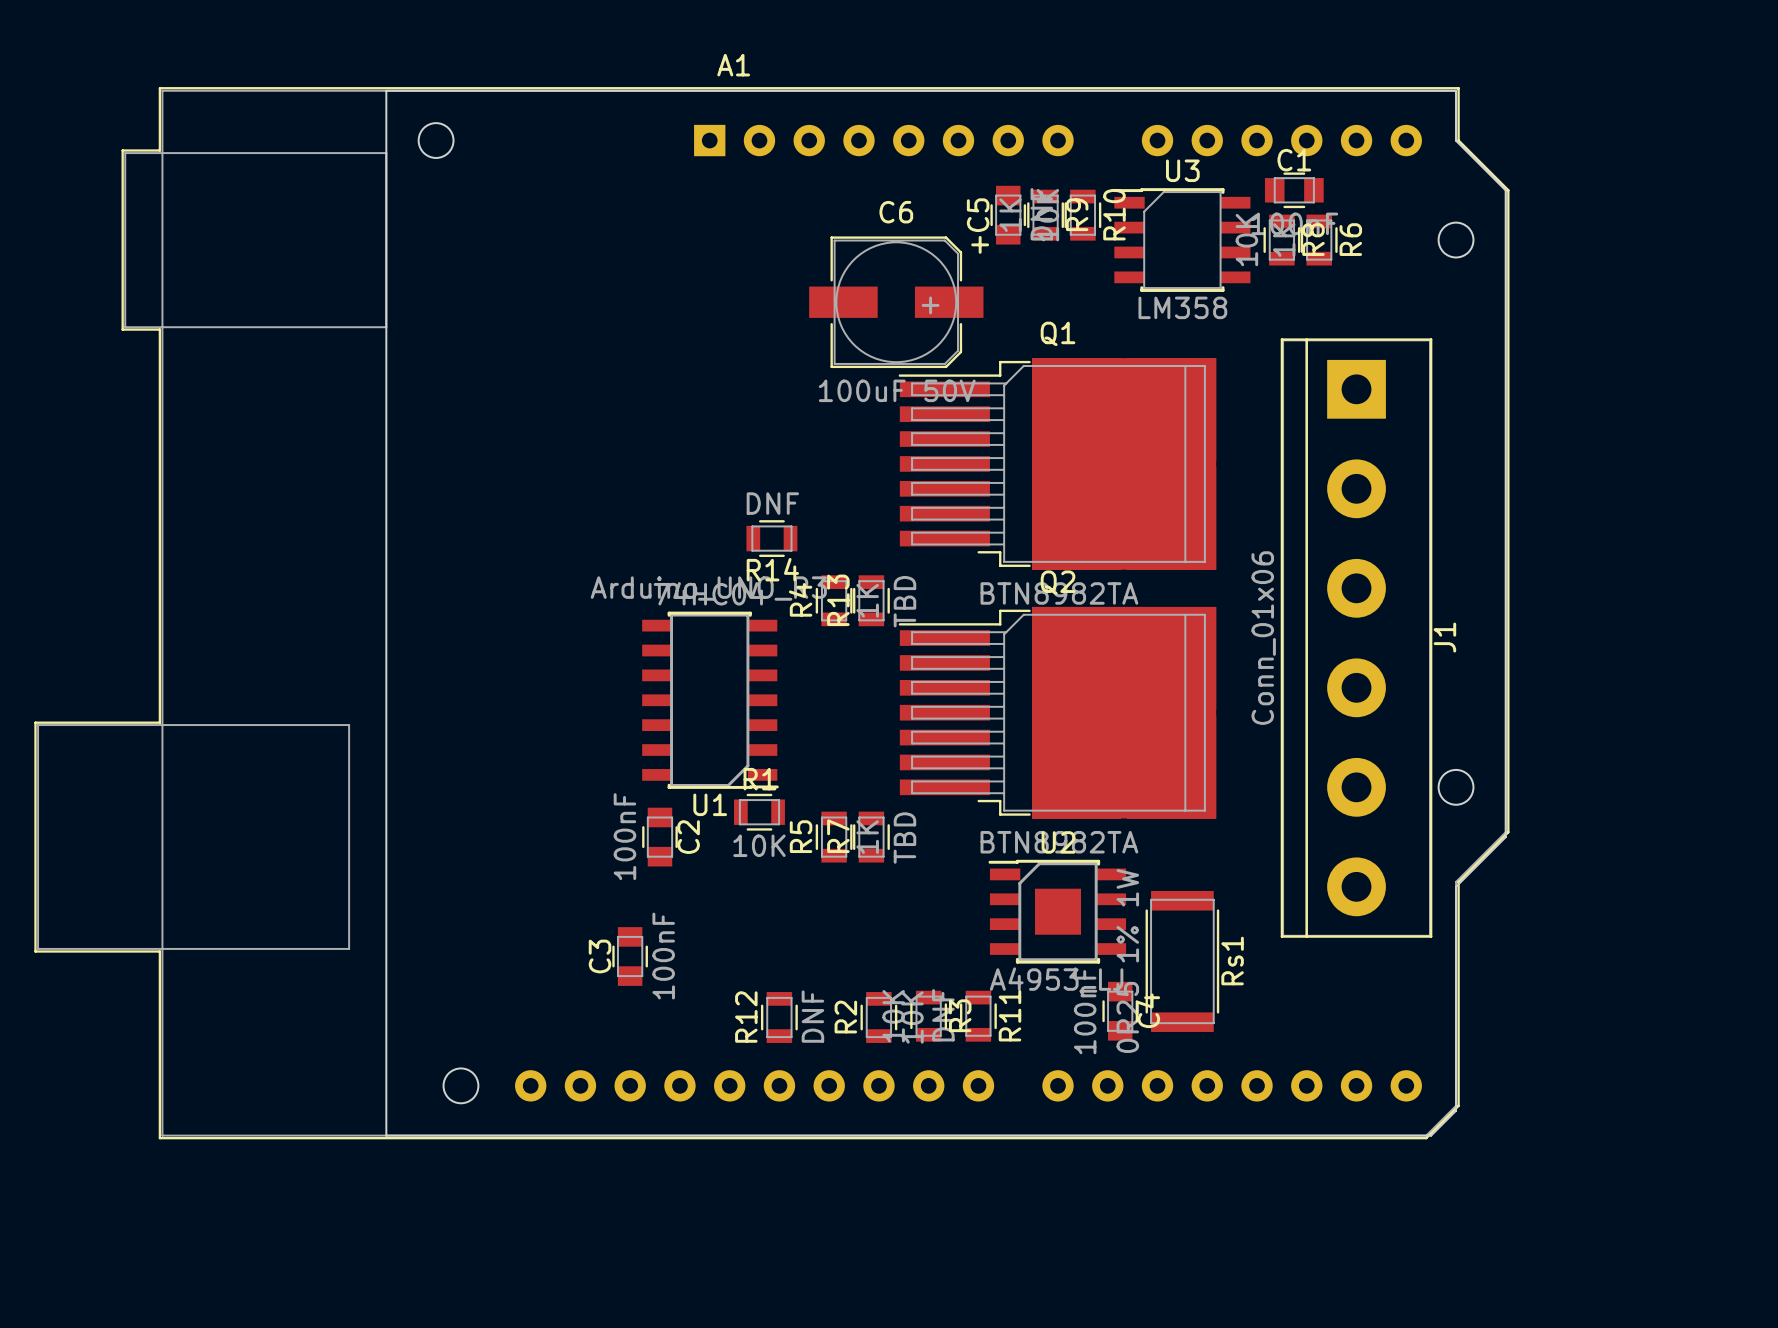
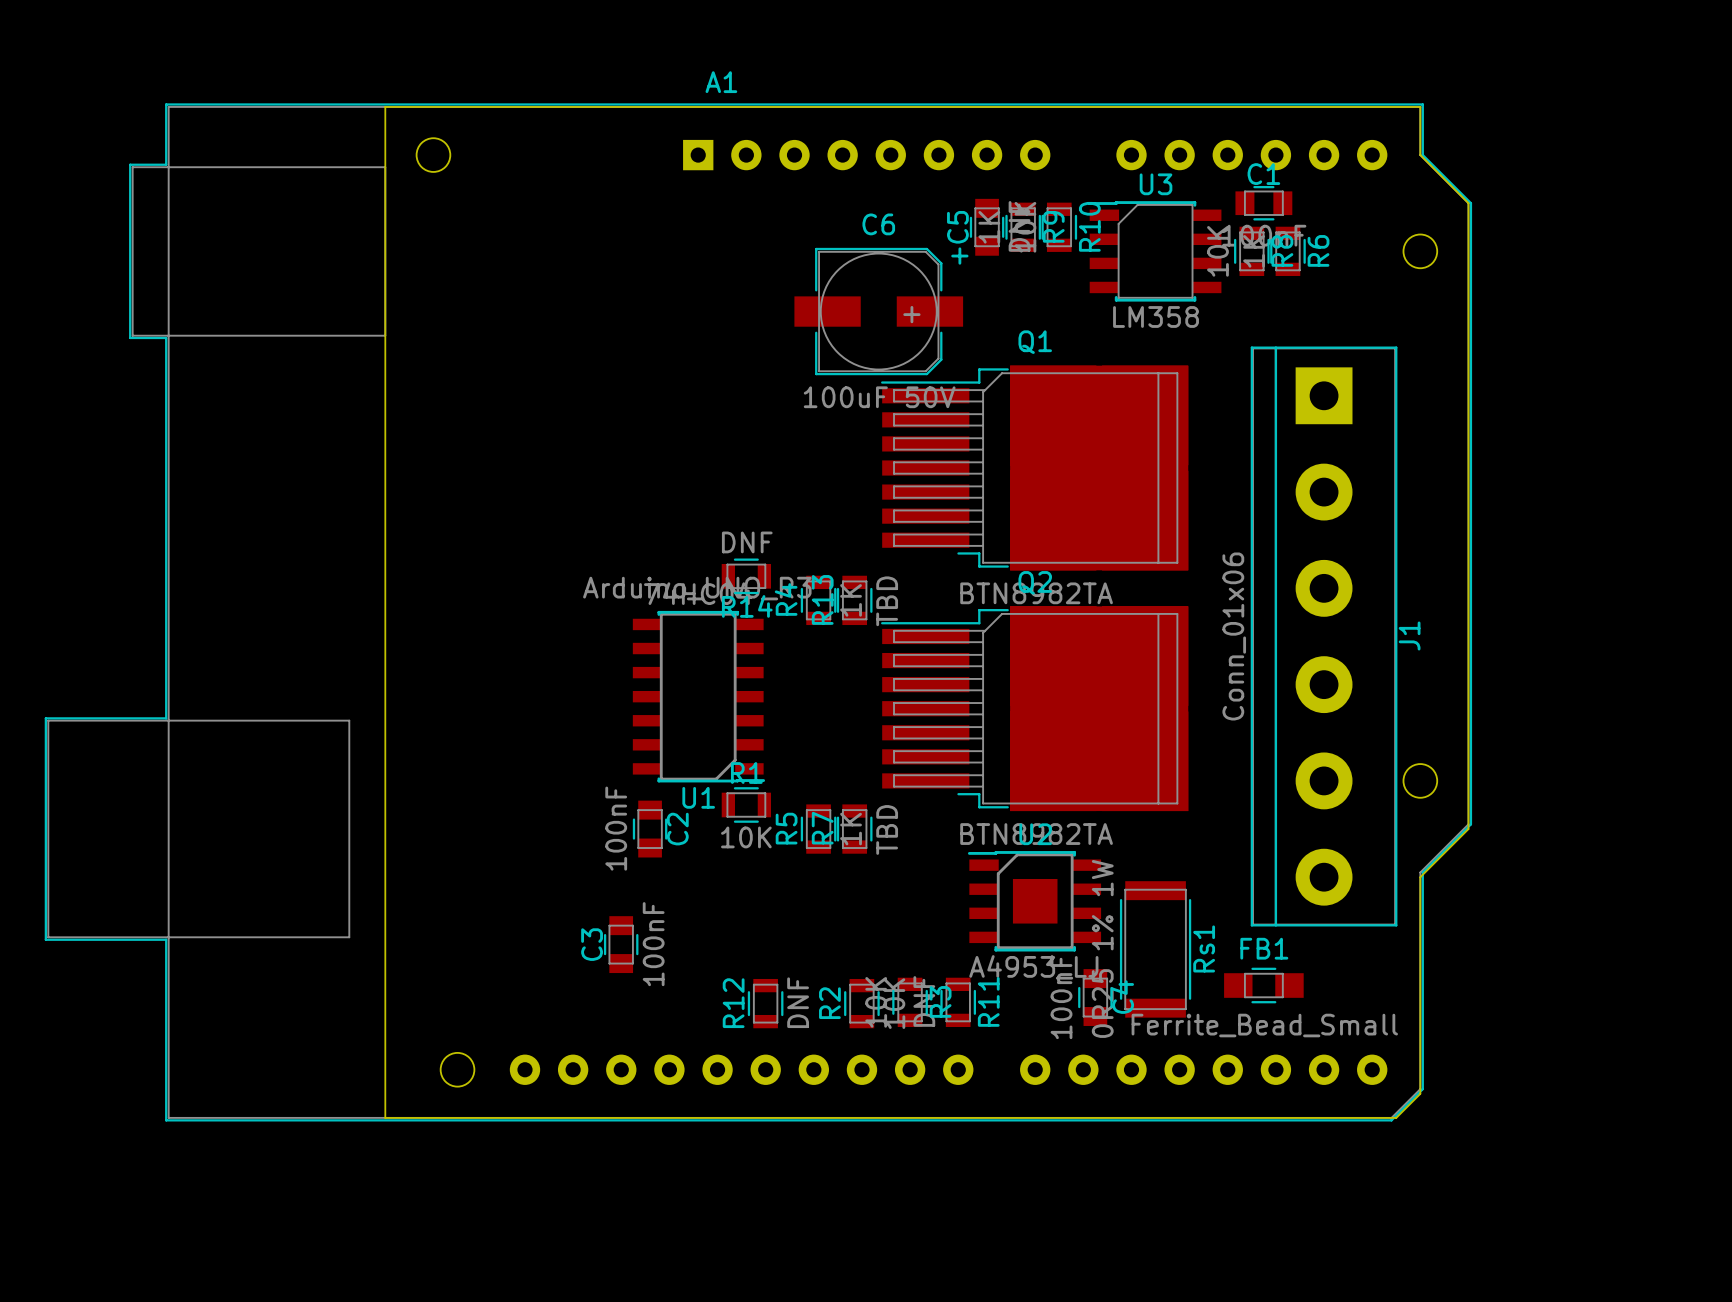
R14 position: (771, 538) -> (746, 576)
FB1: none -> Ferrite_Bead_Small (1263, 985)

